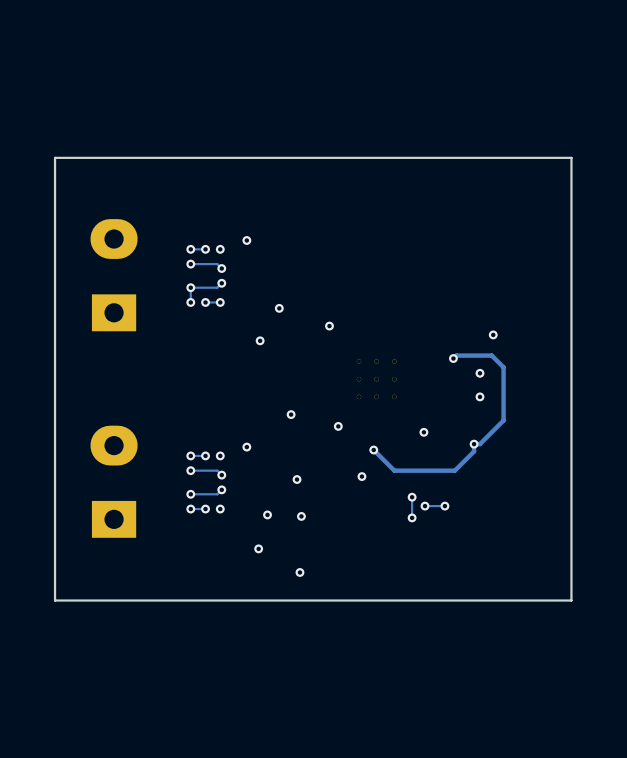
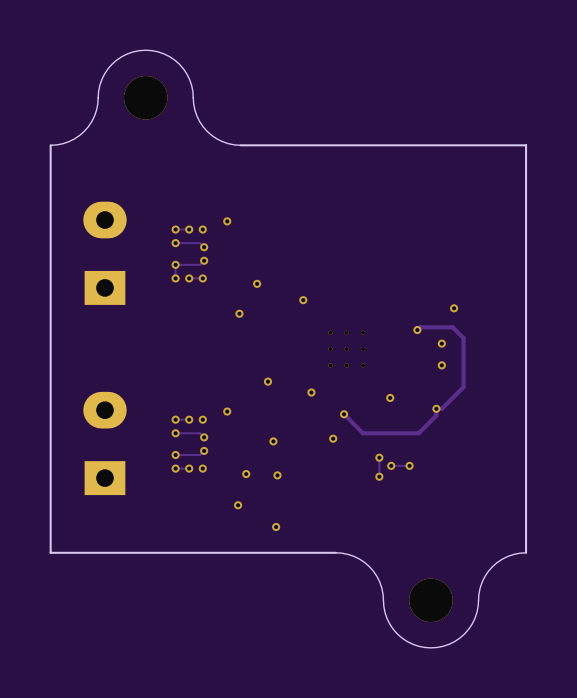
part: none -> (145, 97)
board edge: (261, 157) (55, 157) -> (240, 145) (222, 141) (207, 131) (196, 115) (191, 85) (183, 68) (169, 56) (158, 51) (145, 50) (127, 53) (112, 64) (101, 79) (96, 110) (88, 126) (74, 138) (62, 143) (50, 145)
board edge: (571, 600) (364, 600) -> (526, 552) (507, 556) (492, 566) (482, 582) (476, 612) (468, 629) (454, 641) (443, 646) (430, 647) (412, 644) (397, 633) (387, 618) (381, 588) (373, 571) (359, 559) (348, 554) (335, 552)
part: none -> (430, 600)

